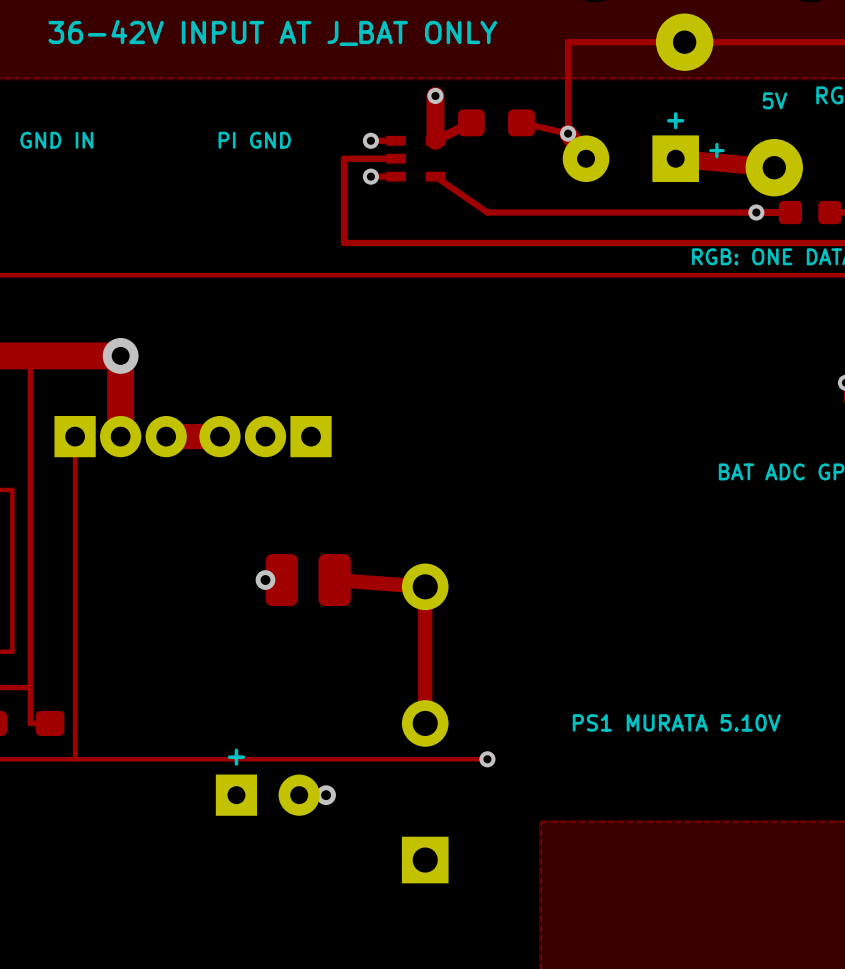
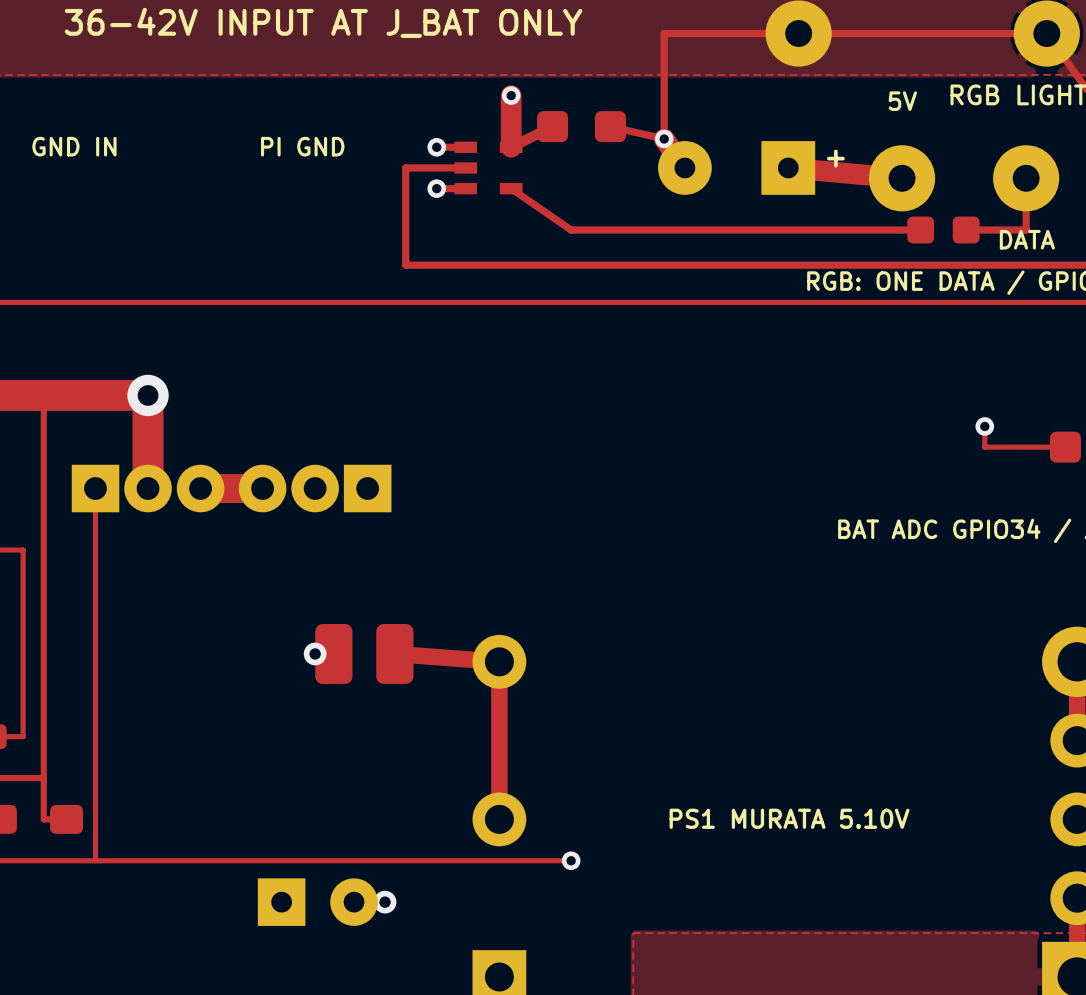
part text: + (675, 120) -> none
via: (756, 212) -> none
part text: + (236, 757) -> none

